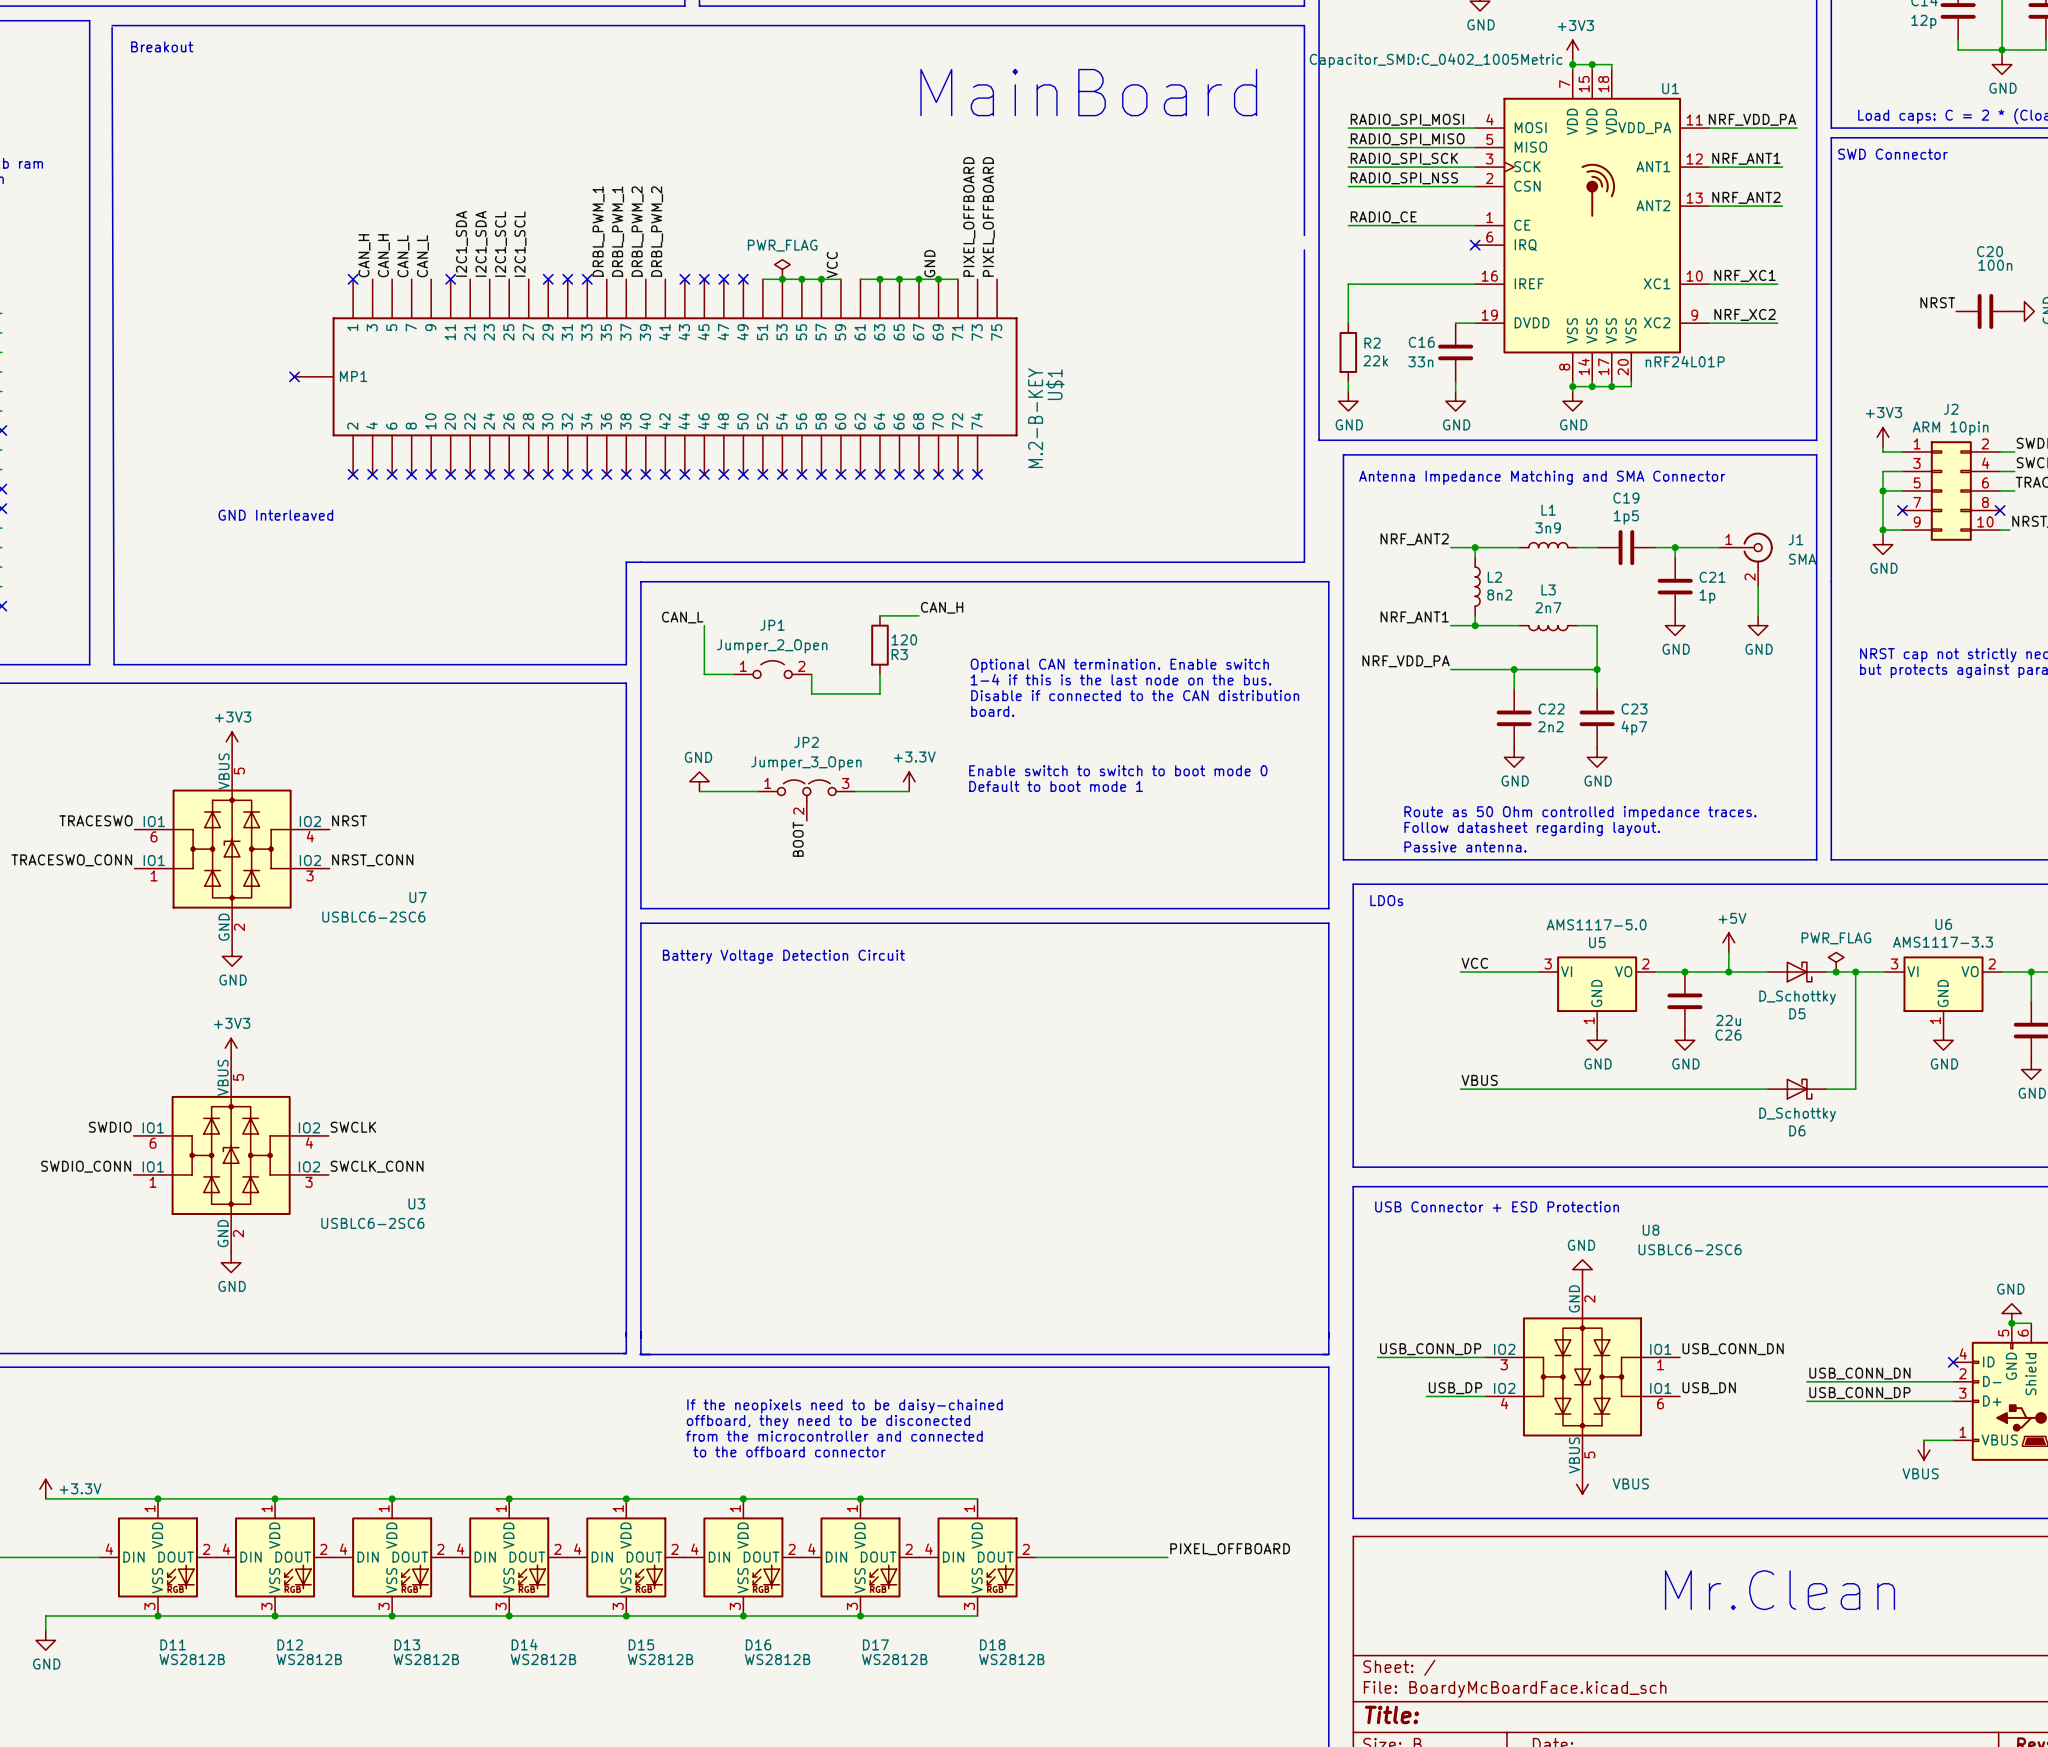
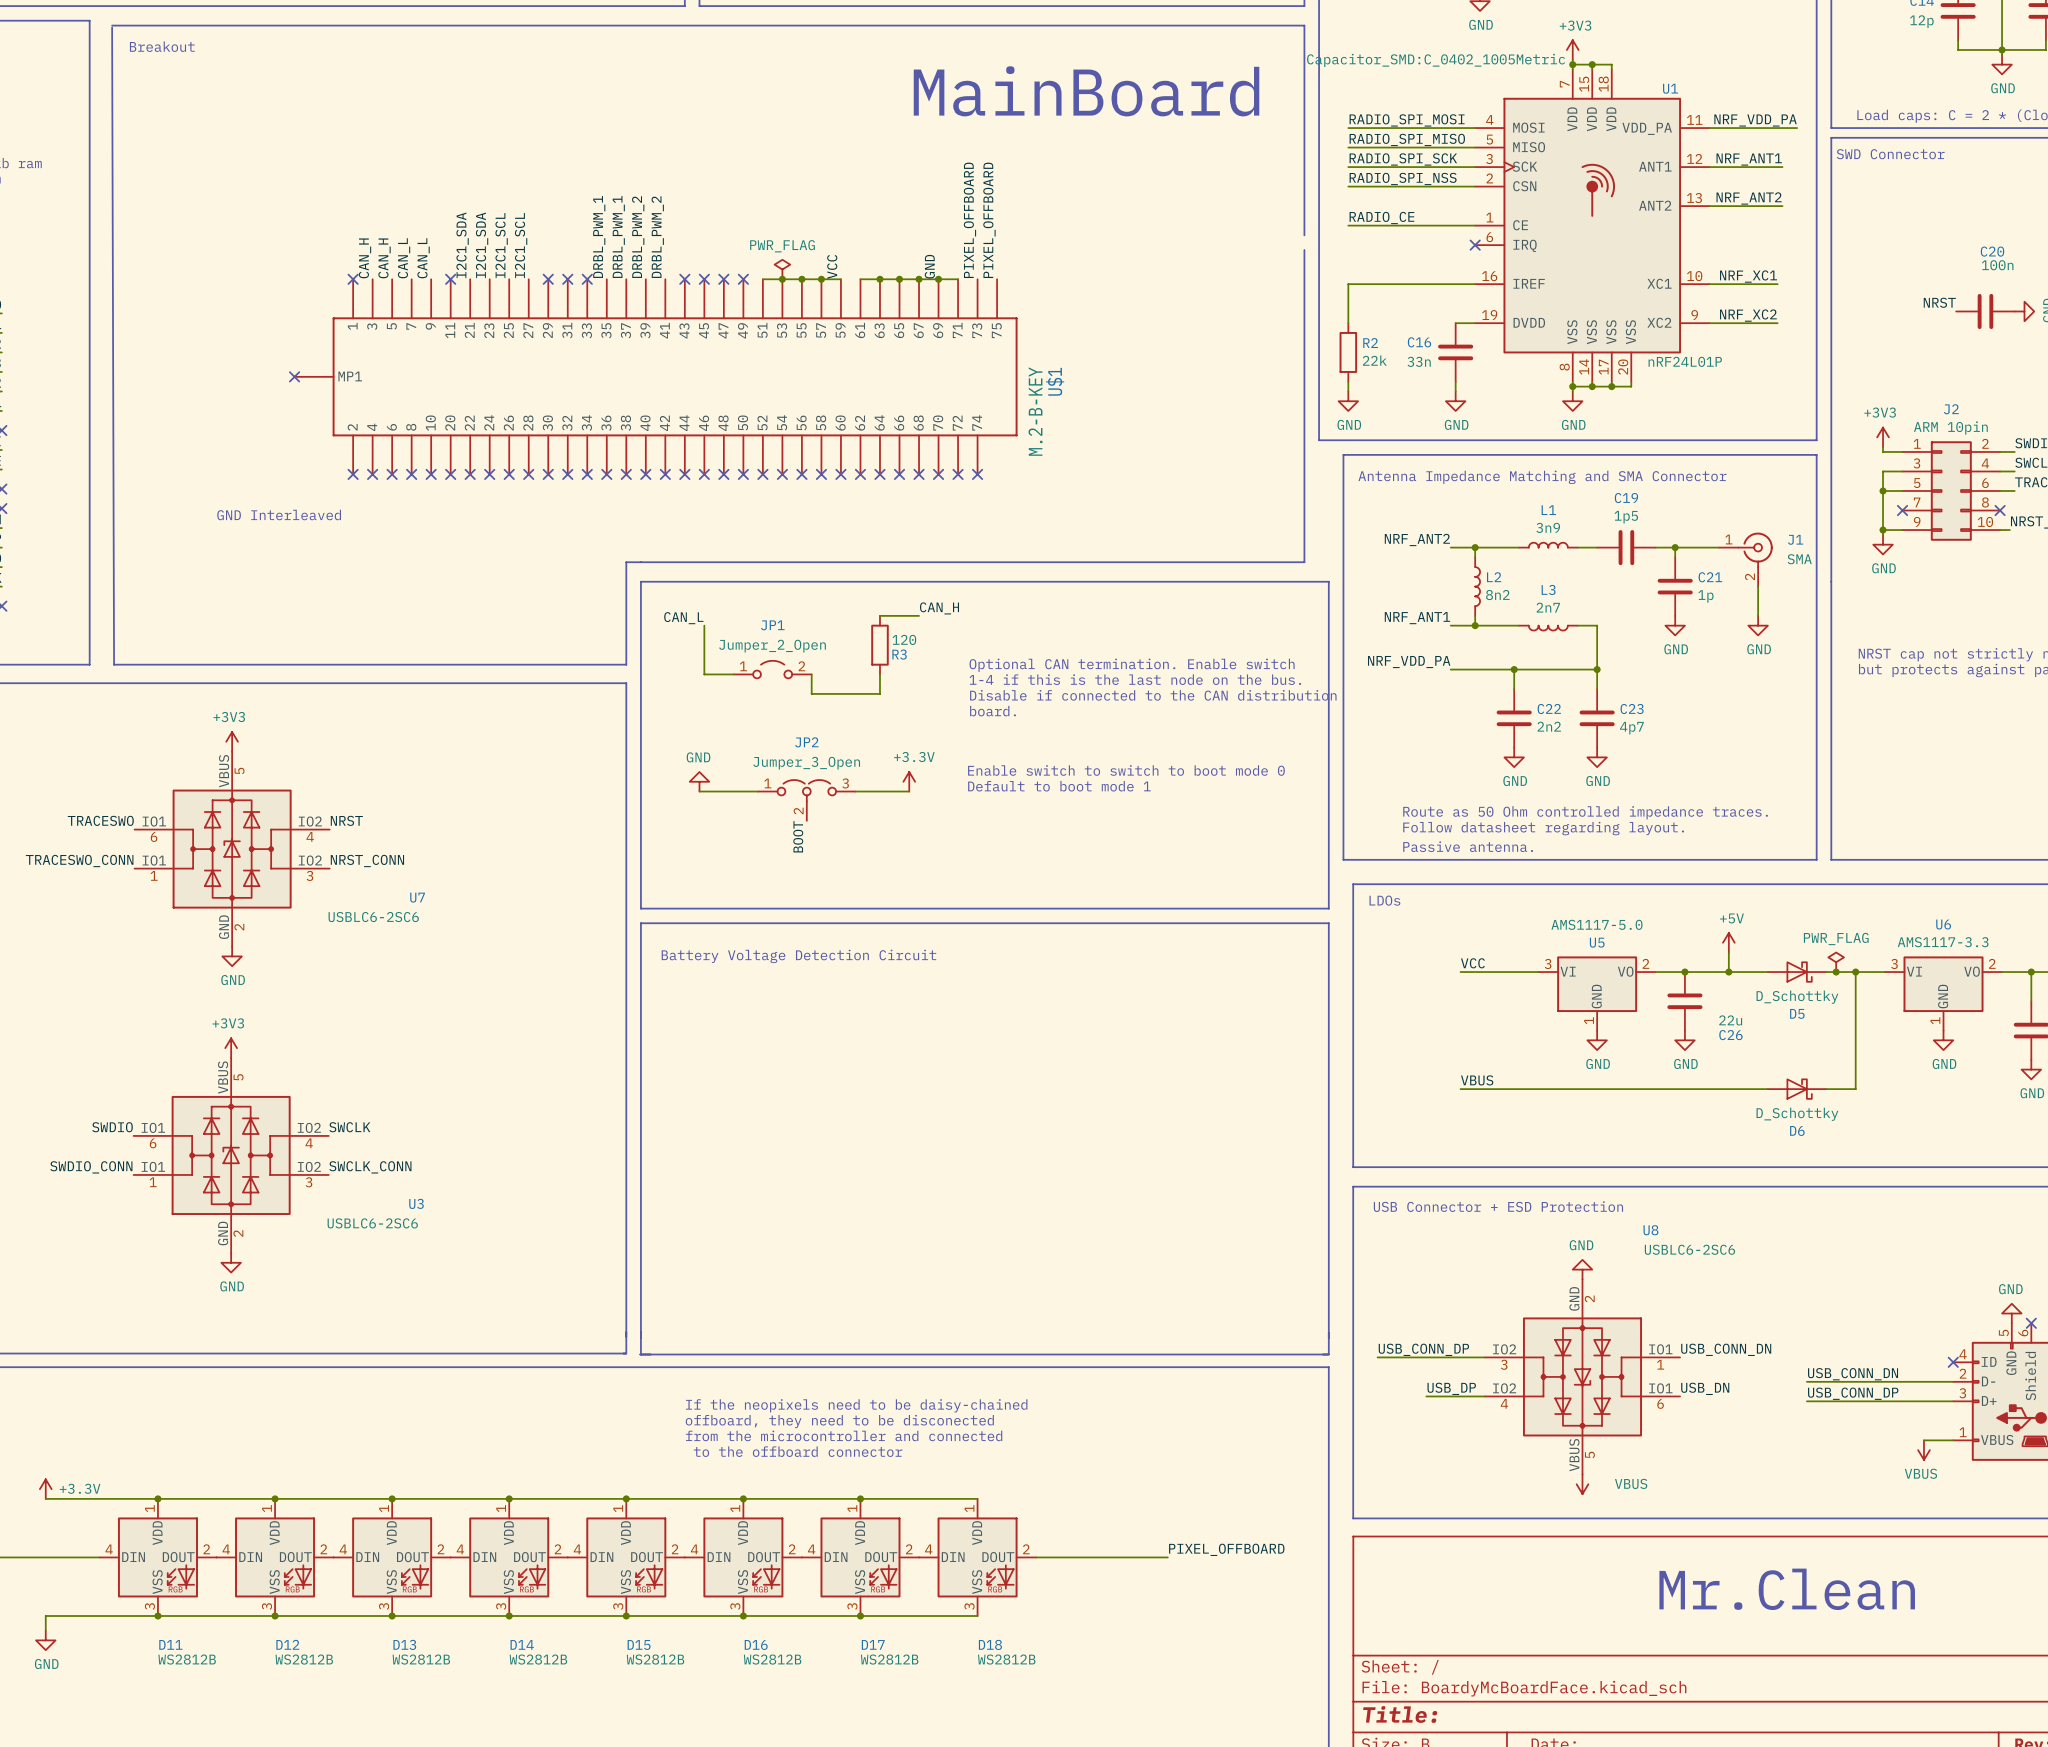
wire: (2011, 1323) (2031, 1323) -> none
junction: (2011, 1323) -> none
no-connect mark: none -> (2031, 1323)

